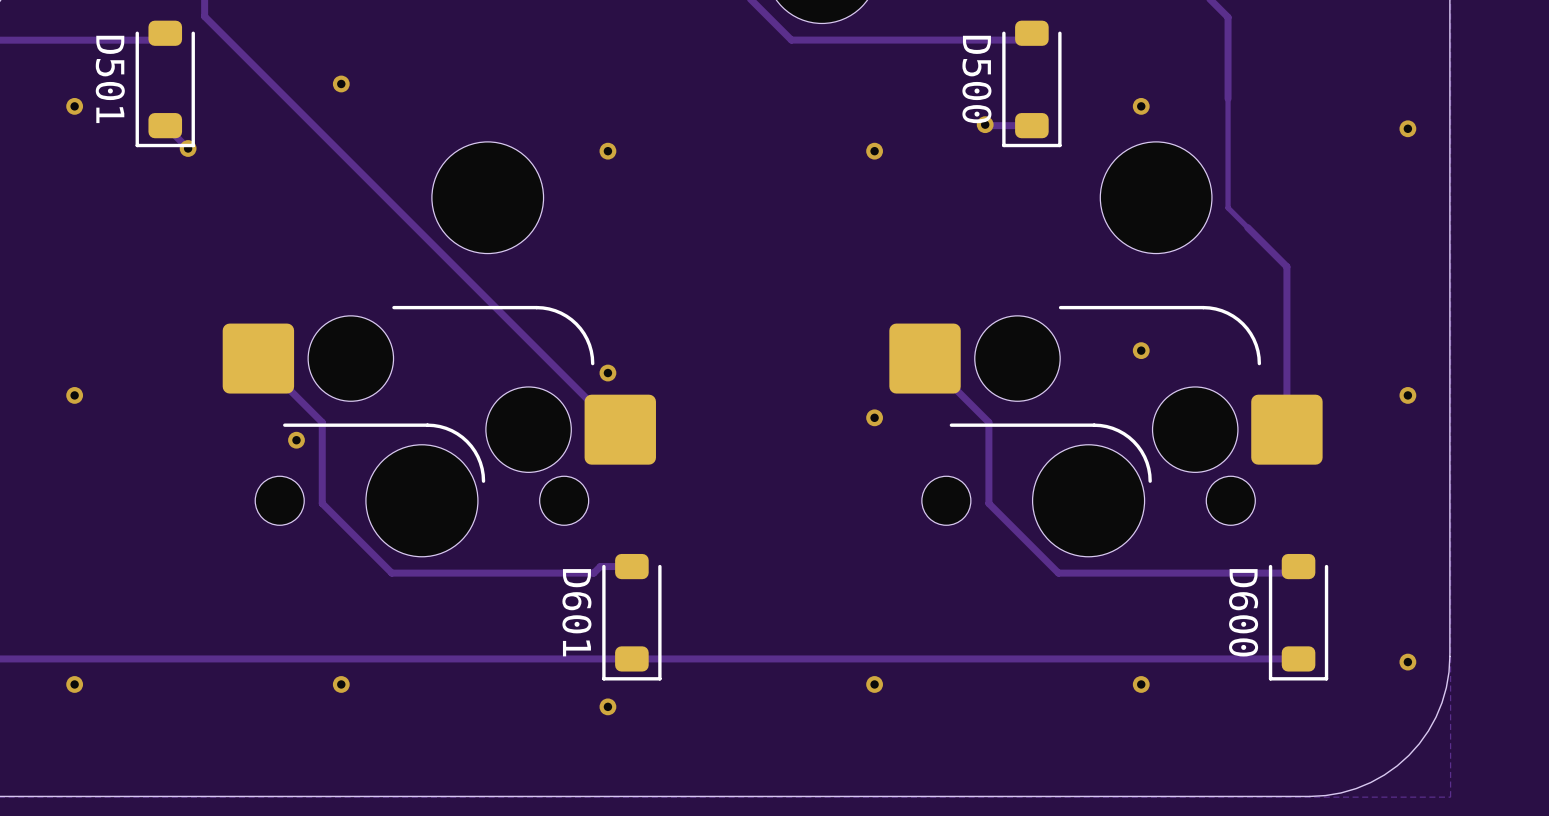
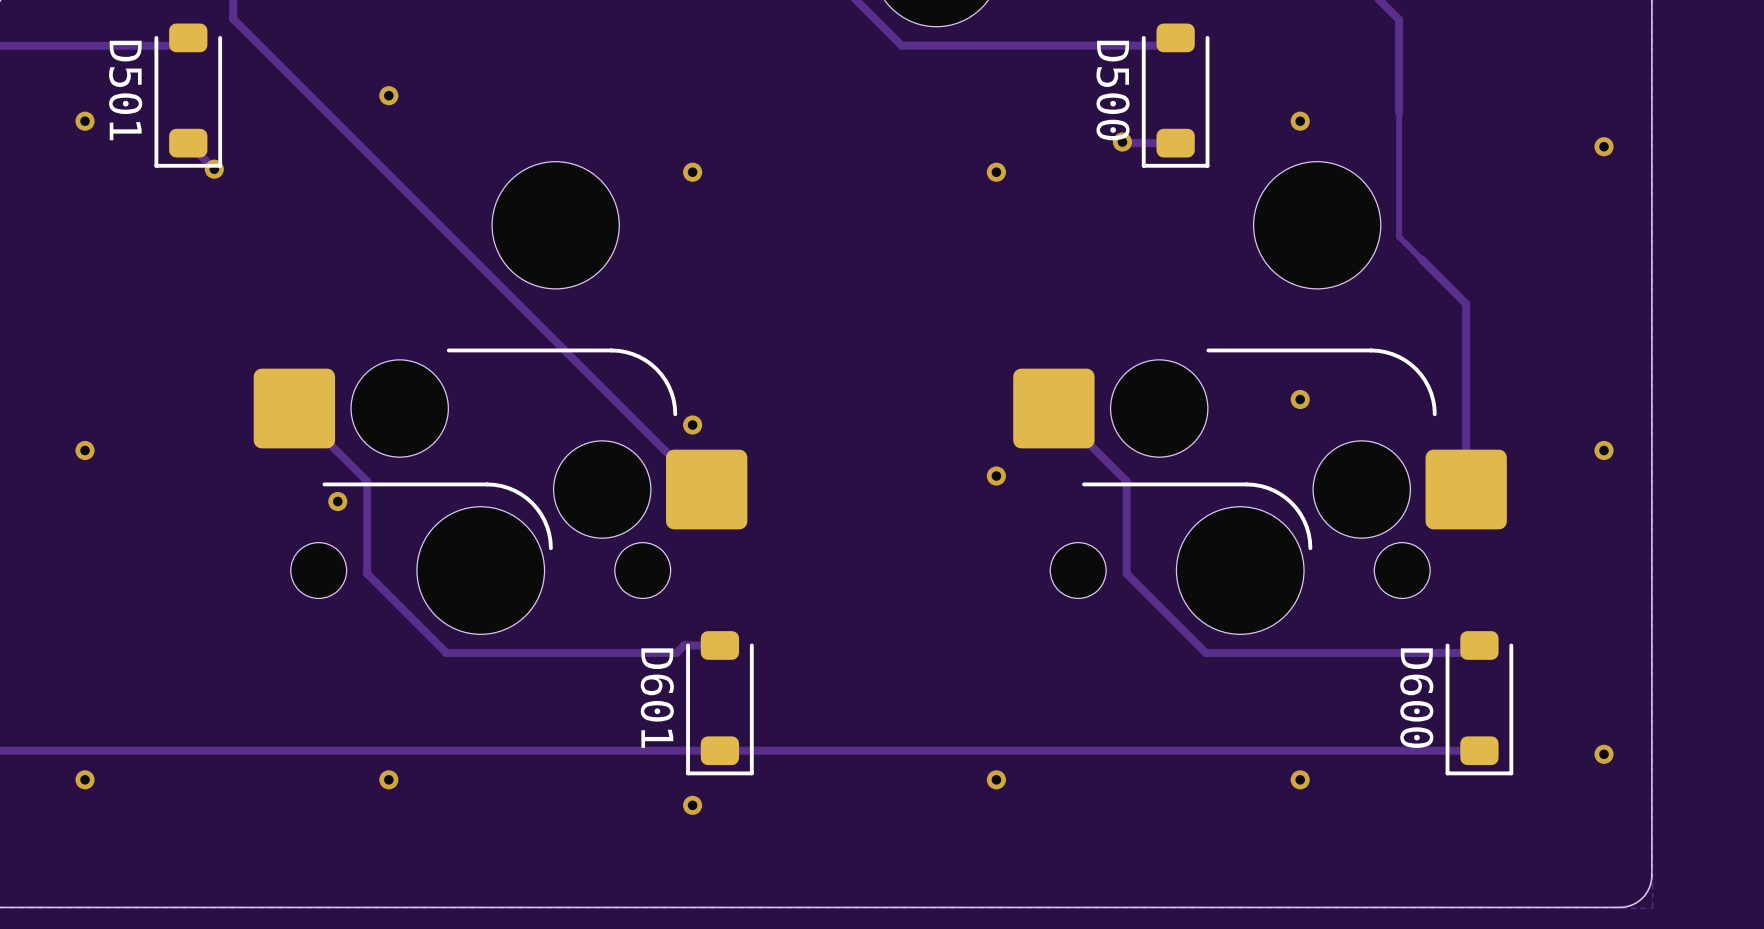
board edge: (1449, 656) (1449, 672) (1442, 702) (1428, 730) (1408, 755) (1384, 774) (1356, 788) (1341, 792) (1309, 796) -> (1651, 747) (1651, 875) (1649, 887) (1642, 898) (1632, 904) (1619, 907) (1492, 907)

